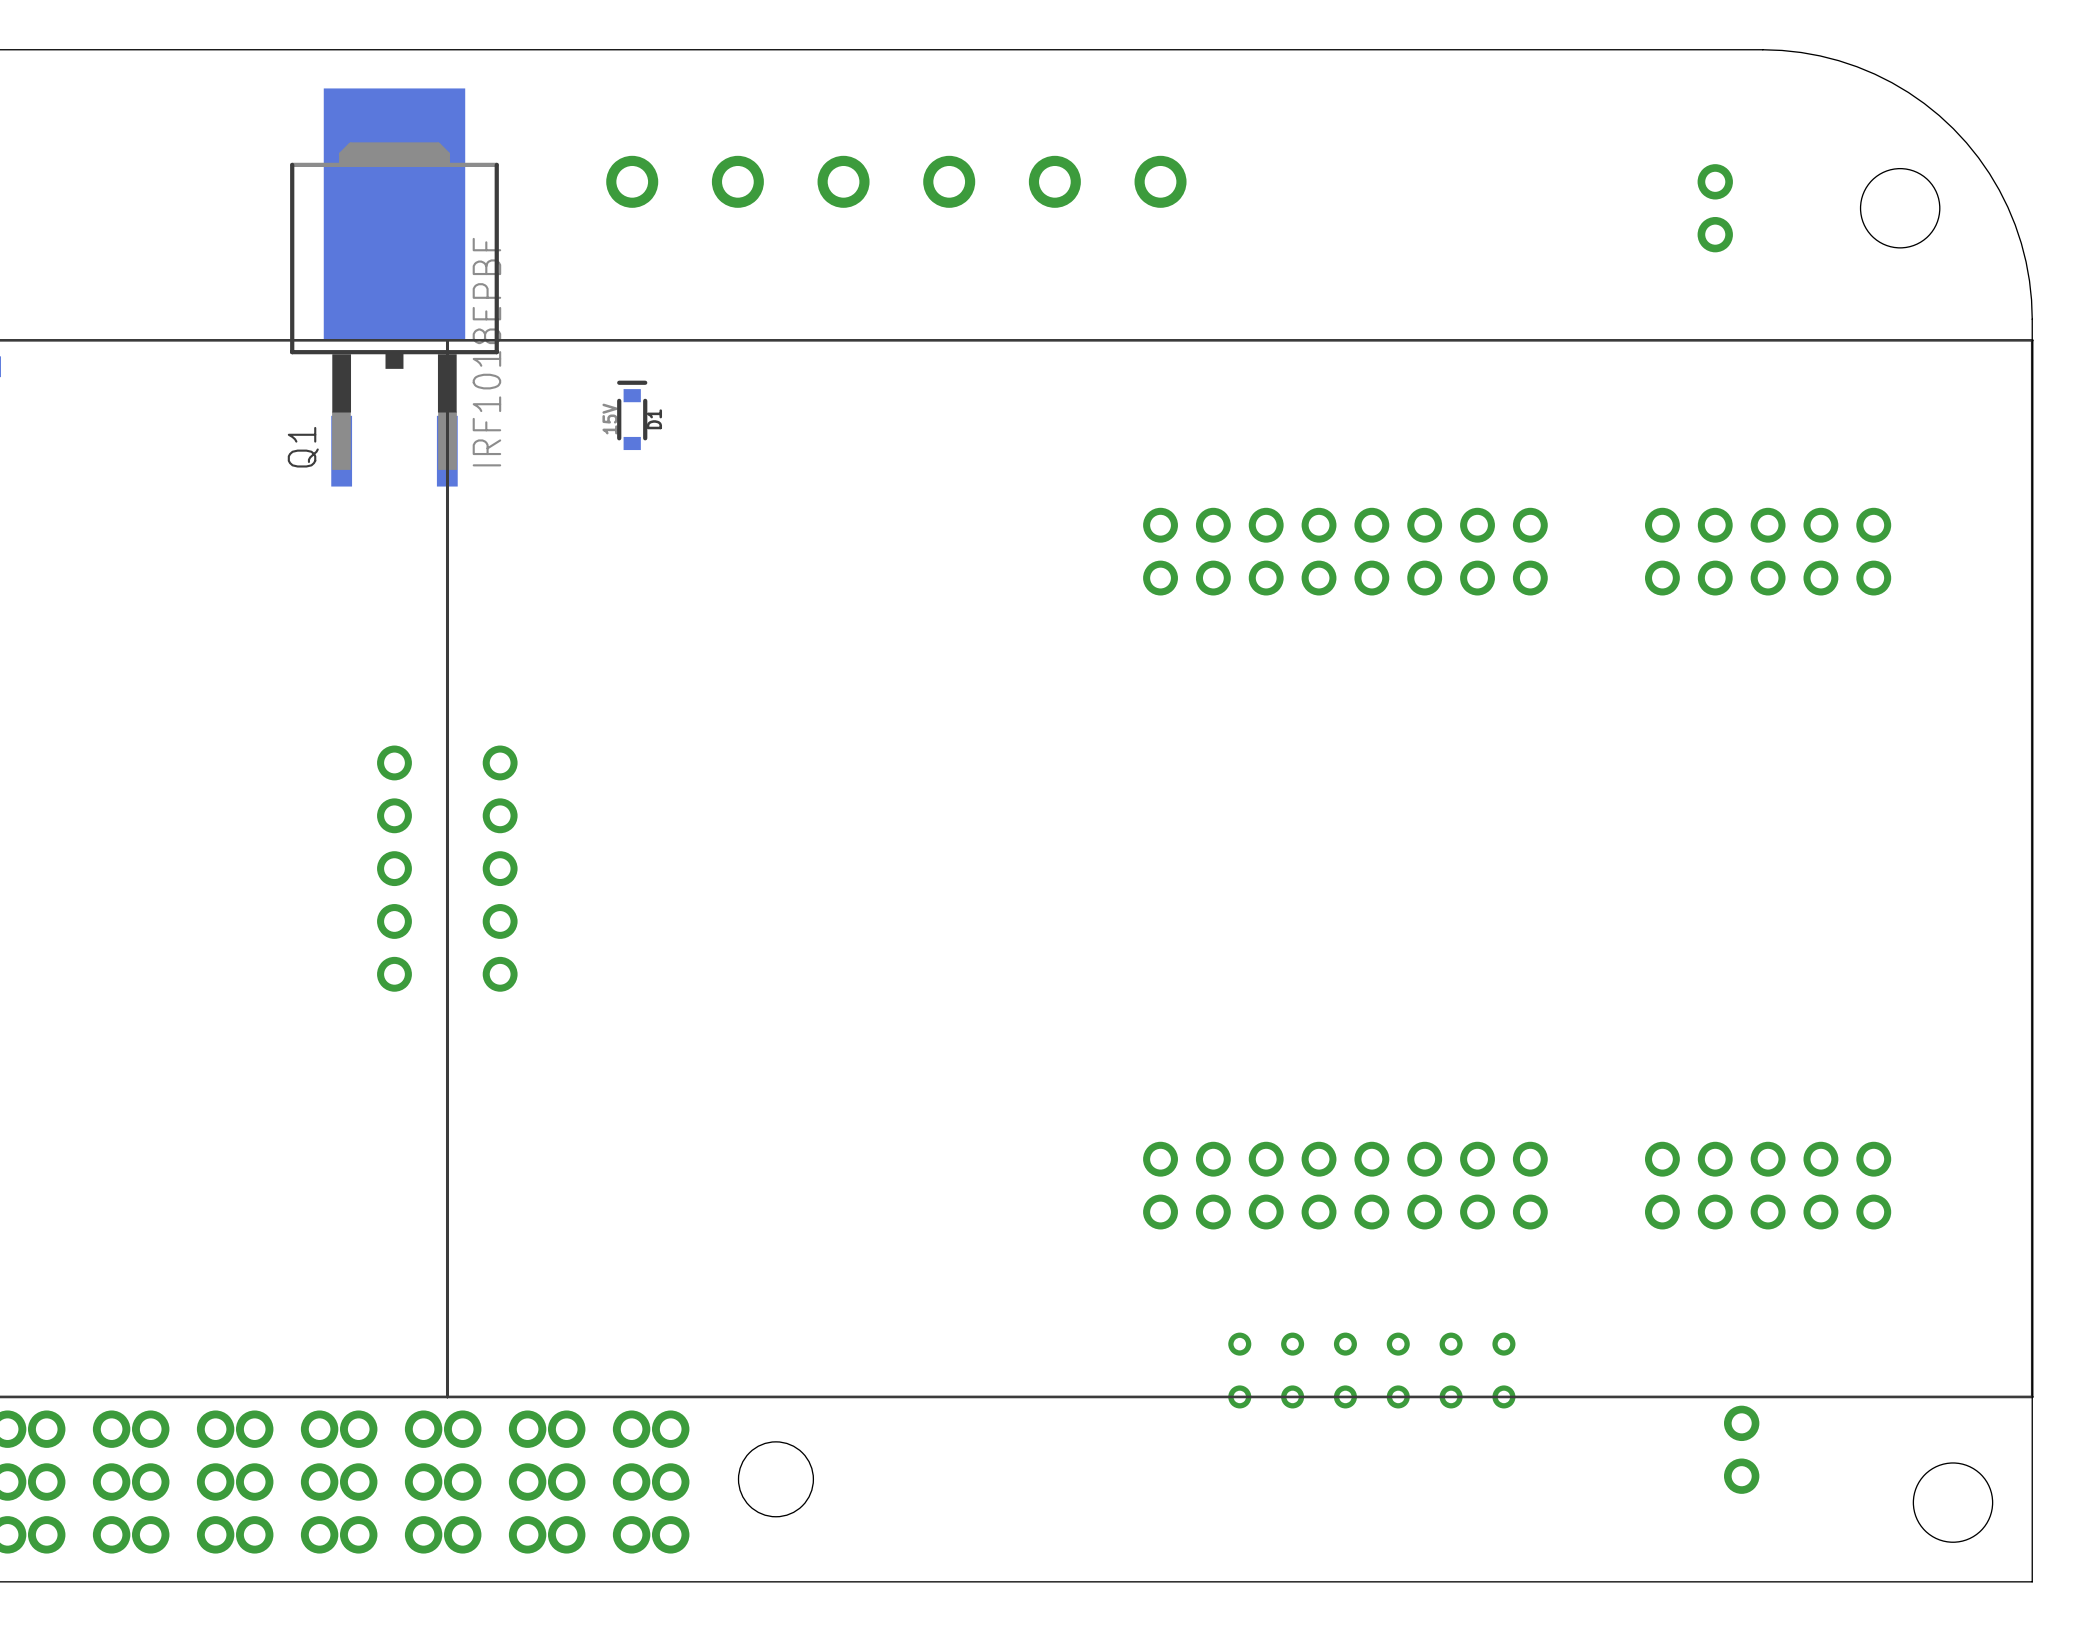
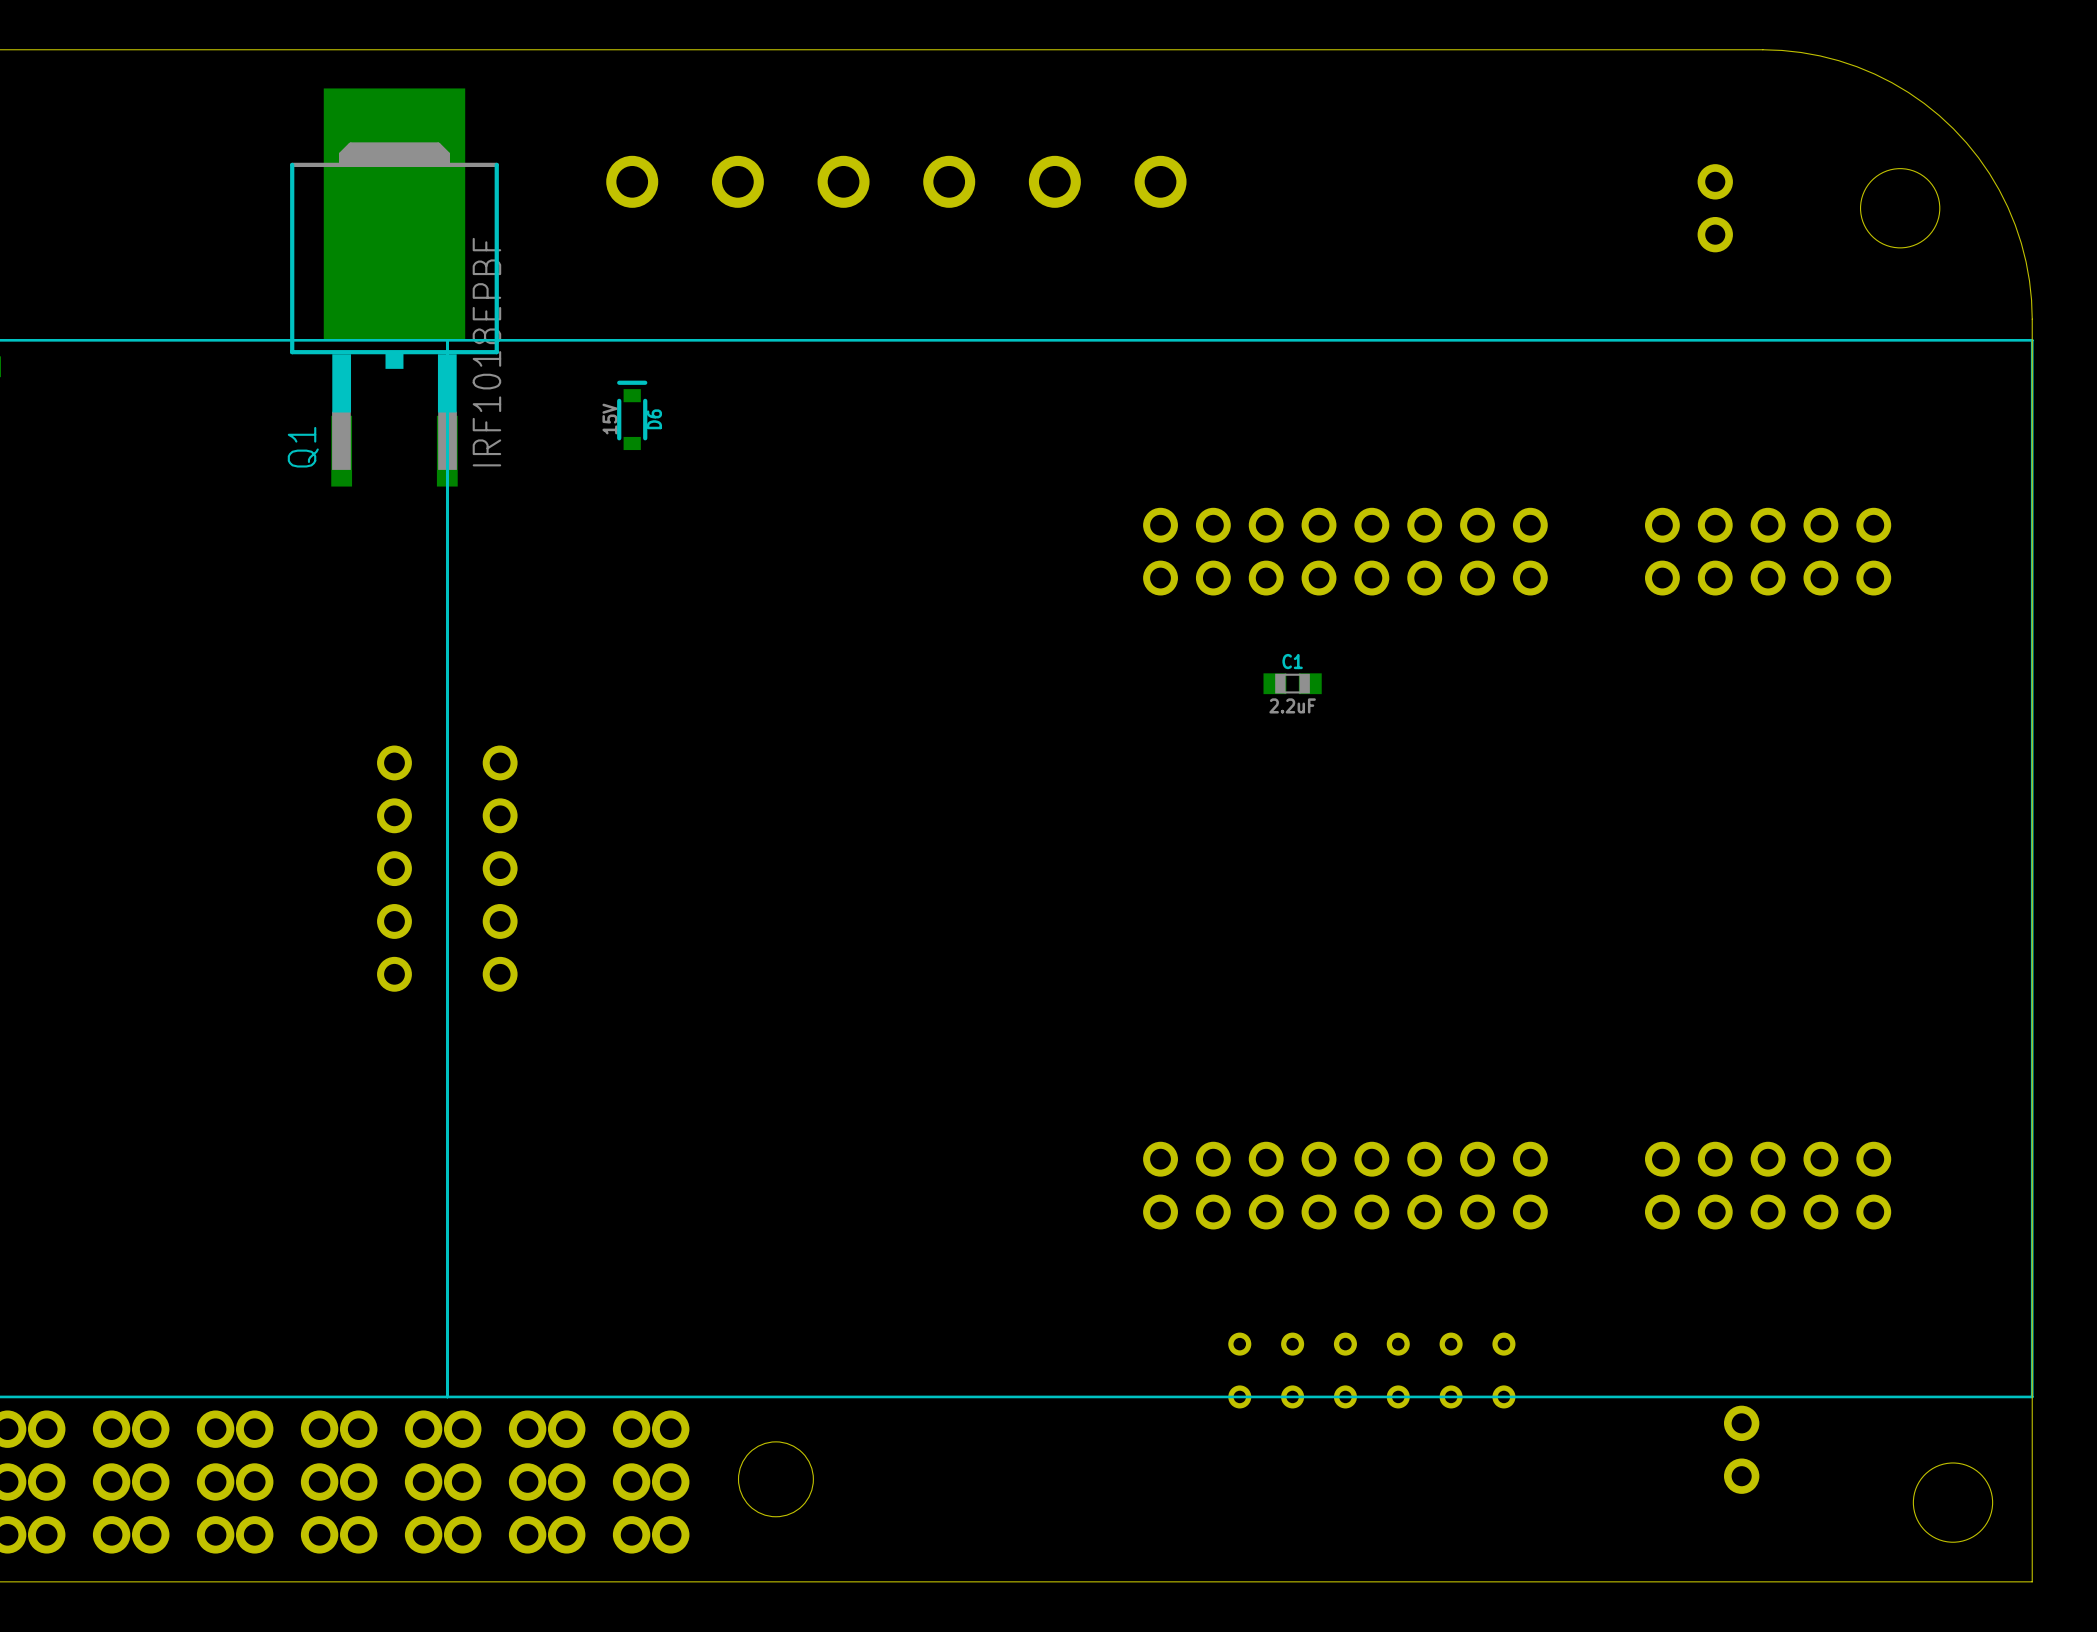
D1 name: D1 (654, 419) -> D6 (654, 419)
C1: none -> 2.2uF (1292, 683)

